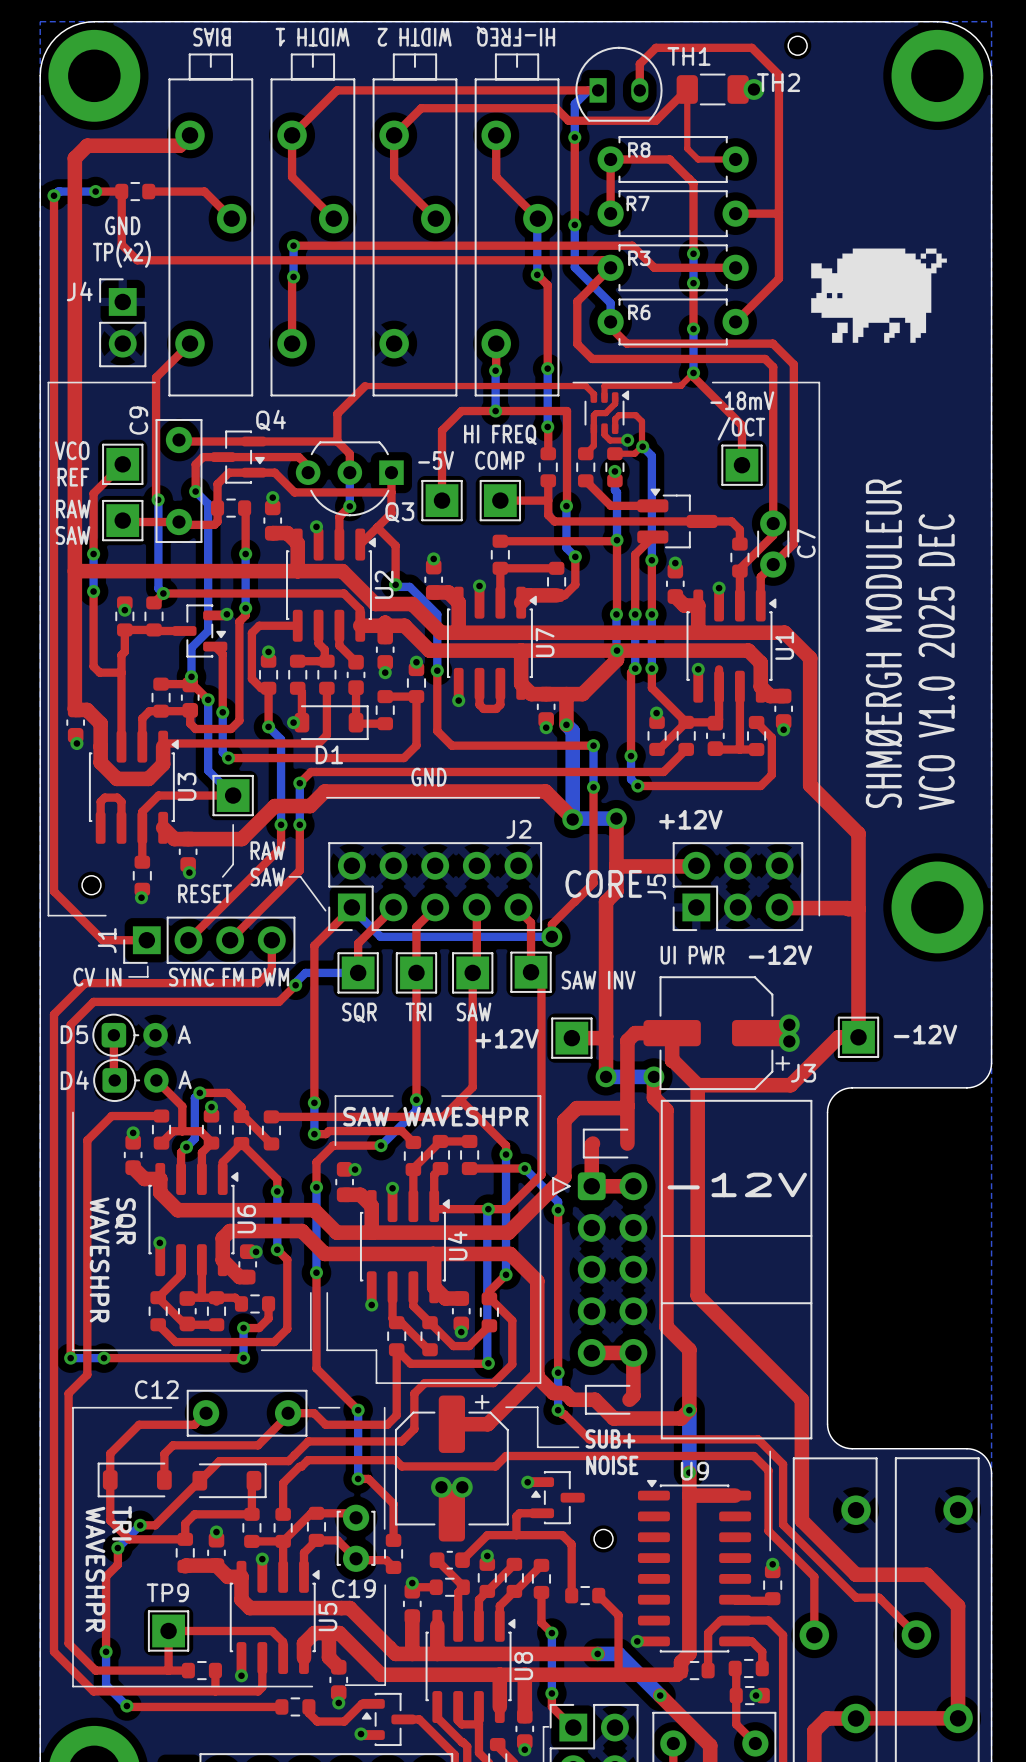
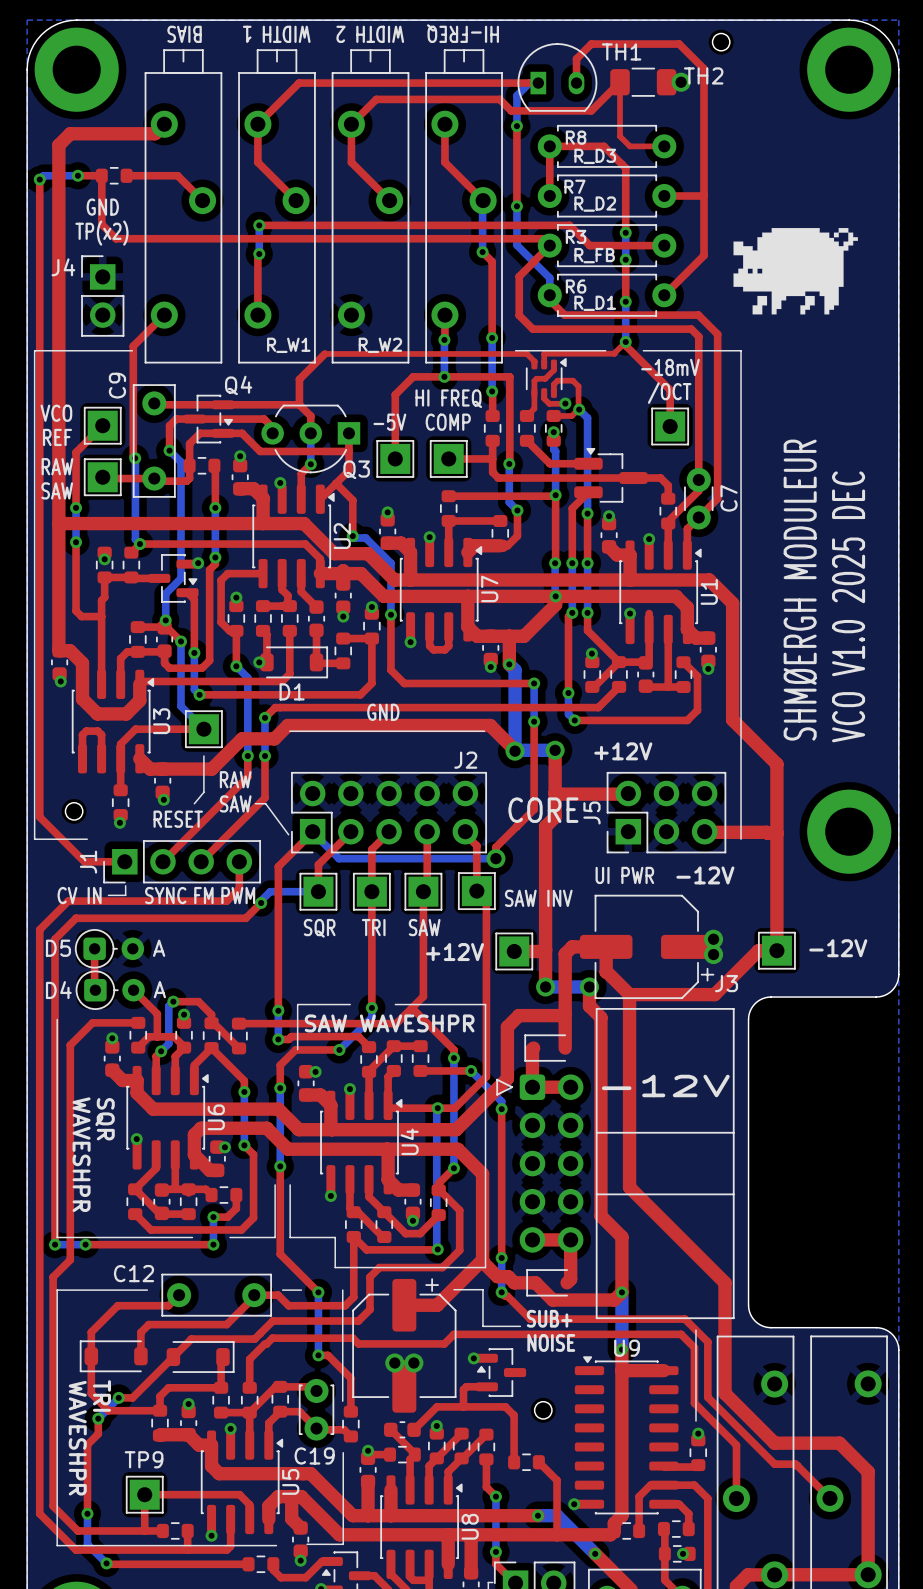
text: none -> R_D3 (595, 156)
text: none -> R_D2 (595, 204)
text: none -> R_FB (594, 255)
text: none -> R_D1 (595, 303)
text: none -> R_W1 (288, 345)
text: none -> R_W2 (380, 345)

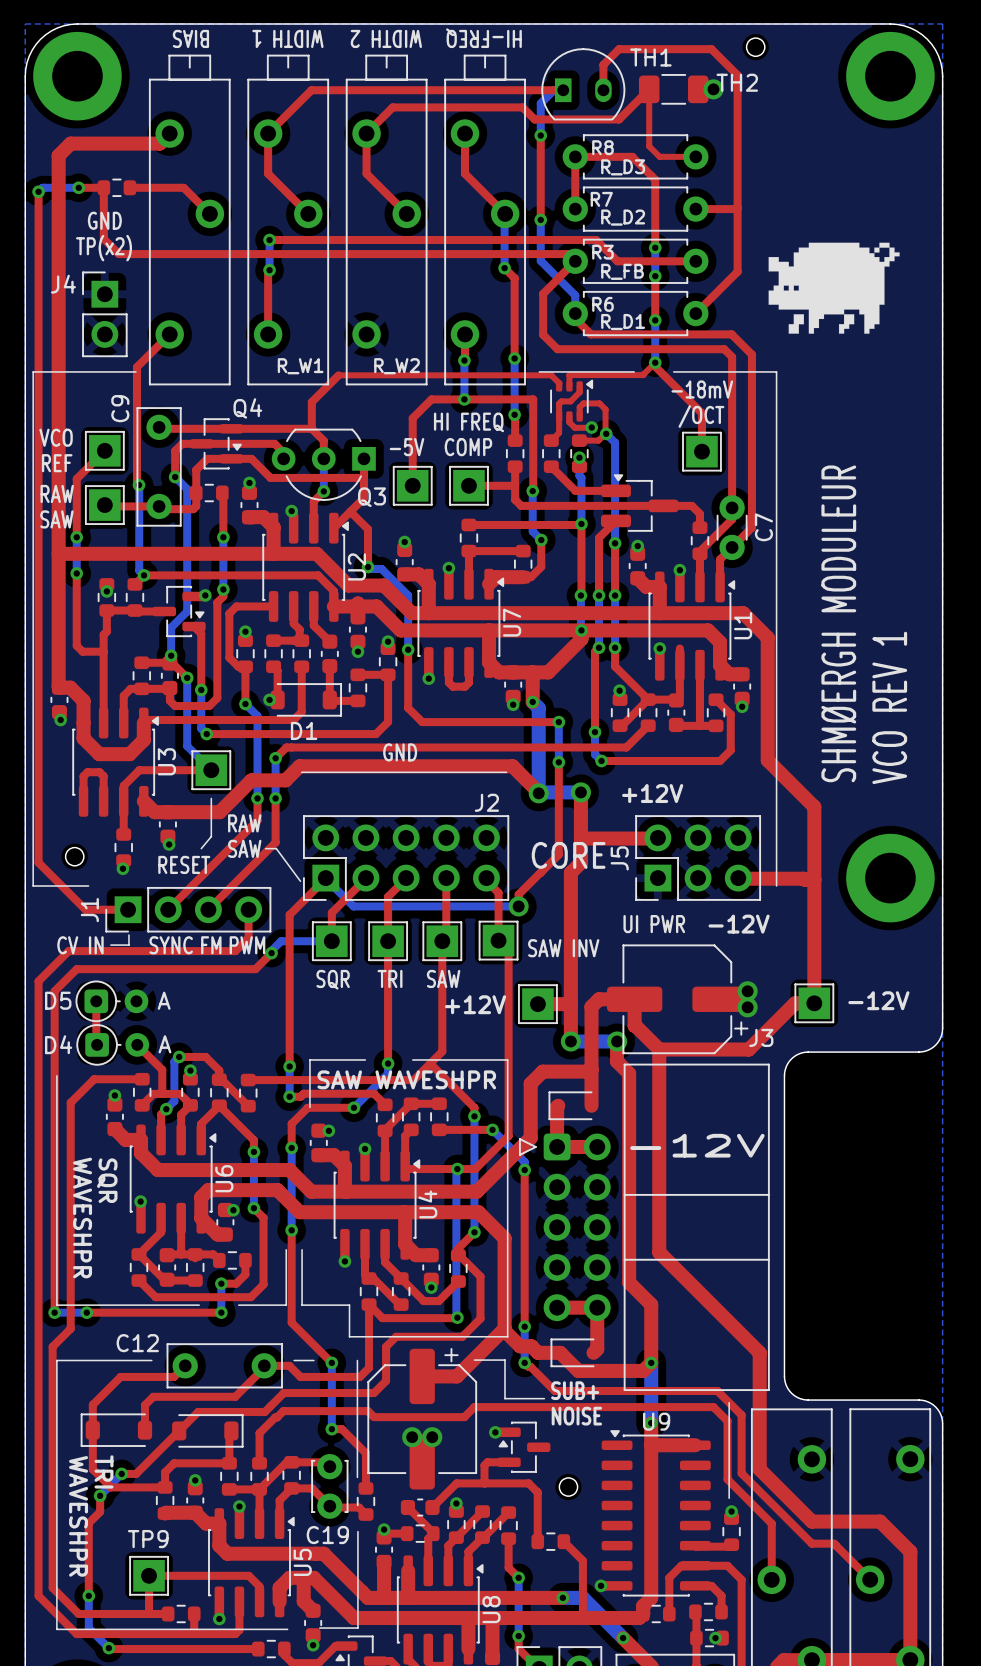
text: VCO V1.0 2025 DEC (848, 606) -> VCO REV 1 (889, 707)

